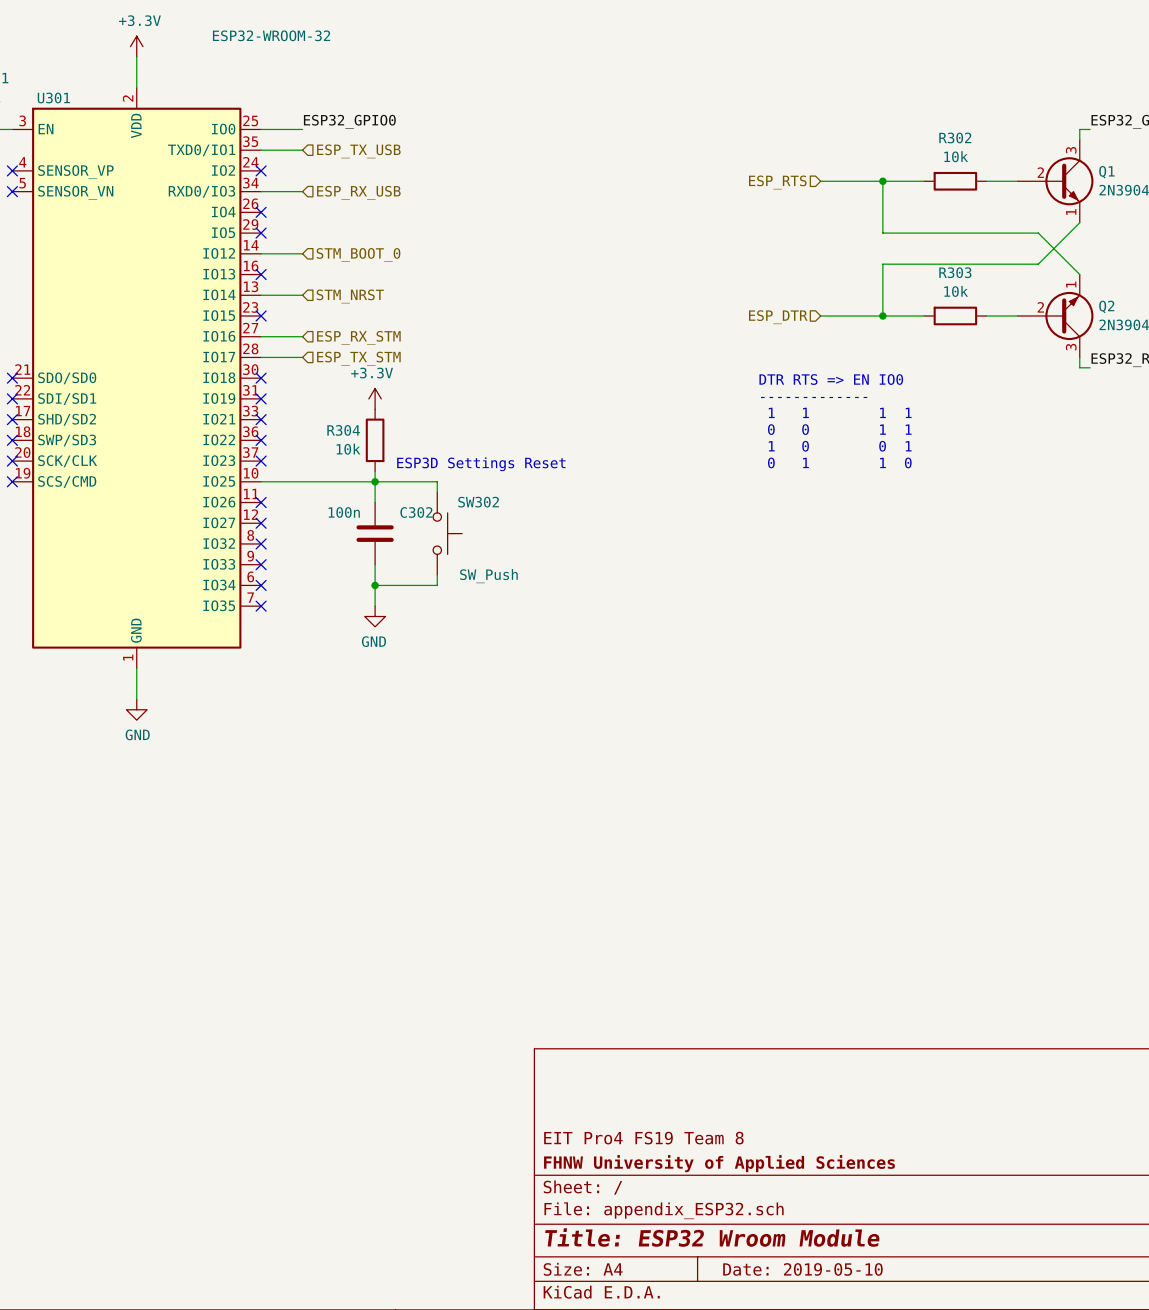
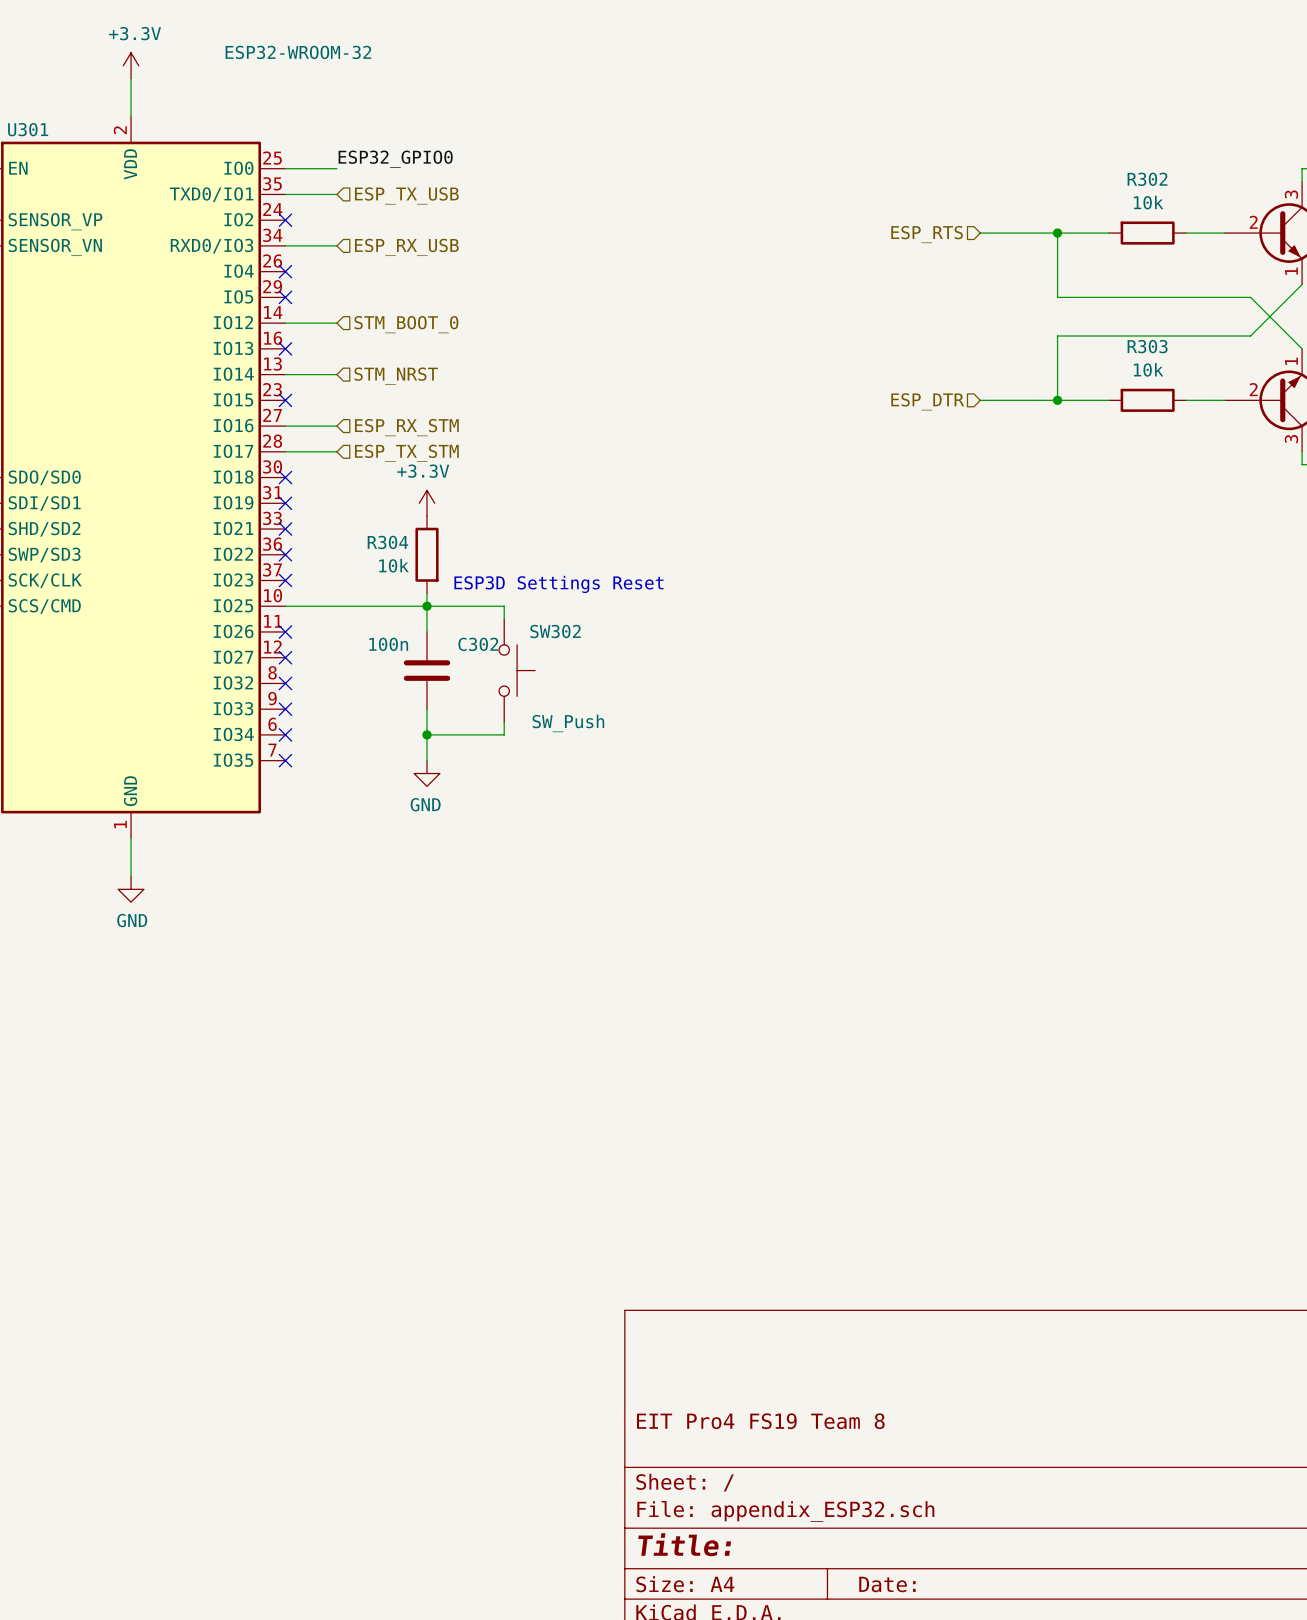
text: DTR RTS => EN IO0 (831, 379) -> none
text: ------------- (814, 397) -> none
text: 1 1 1 1 (840, 412) -> none
text: 0 0 1 1 (839, 429) -> none
text: 1 0 0 1 (840, 446) -> none
text: 0 1 1 0 (839, 462) -> none
title block: FHNW University of Applied Sciences (719, 1163) -> none
title block: Title: ESP32 Wroom Module (712, 1237) -> Title: (684, 1544)
title block: Date: 2019-05-10 (802, 1269) -> Date: (887, 1584)

